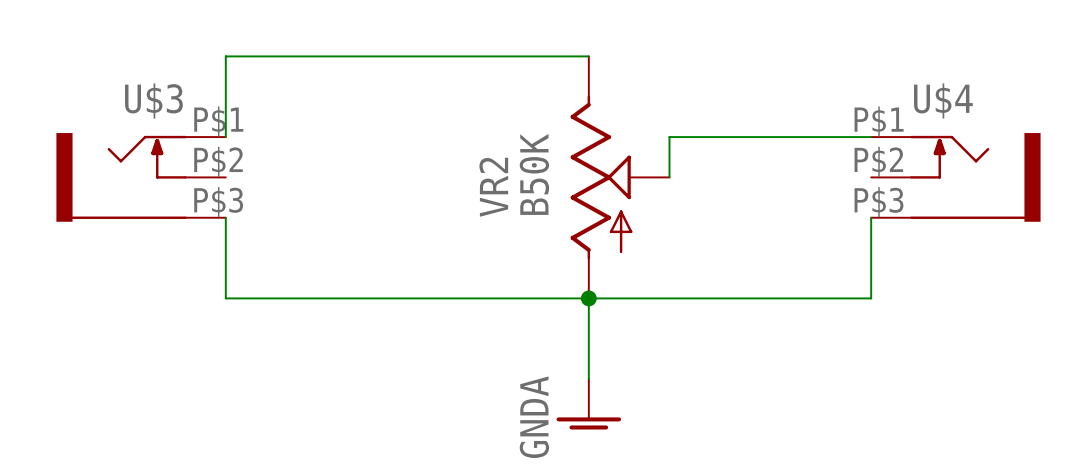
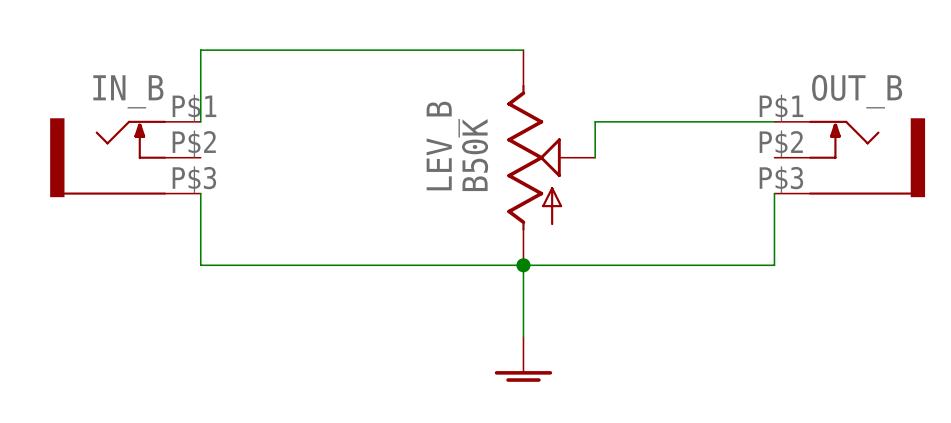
U$3 name: U$3 (153, 101) -> IN_B (128, 91)
U$4 name: U$4 (943, 101) -> OUT_B (857, 91)
VR2 name: VR2 (493, 187) -> LEV_B (443, 146)
power symbol text: GNDA (534, 417) -> none

